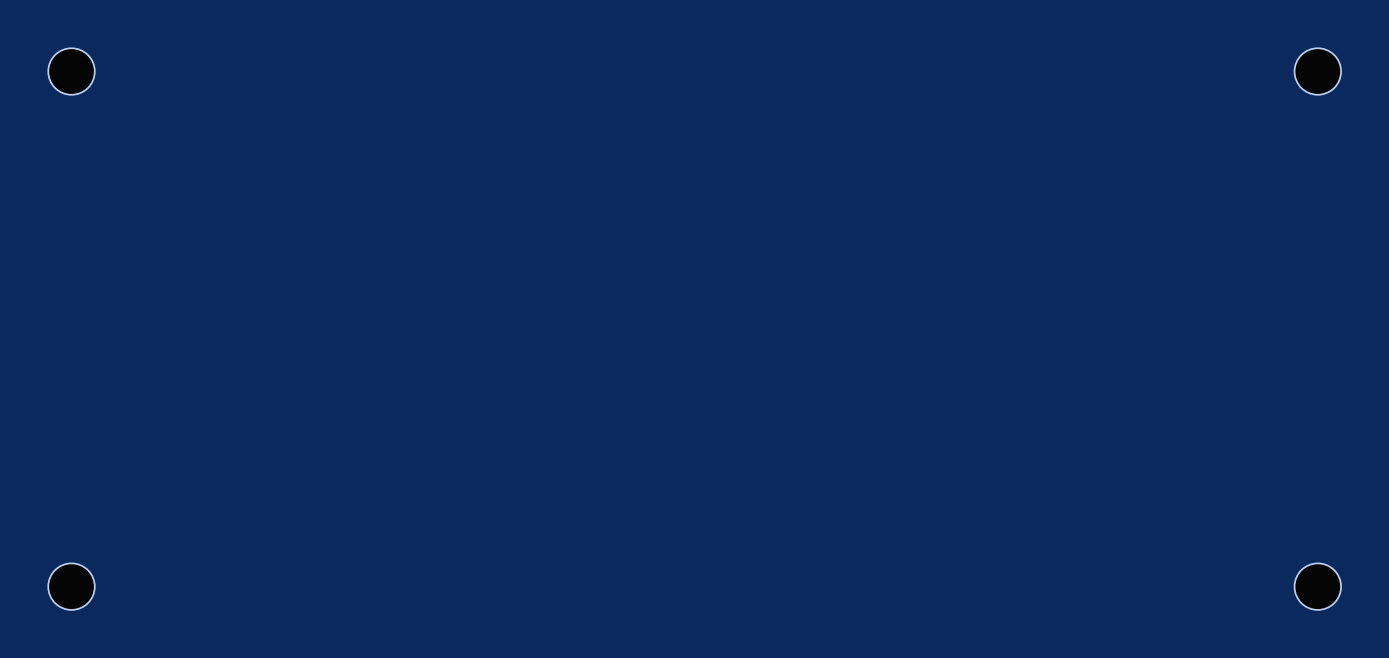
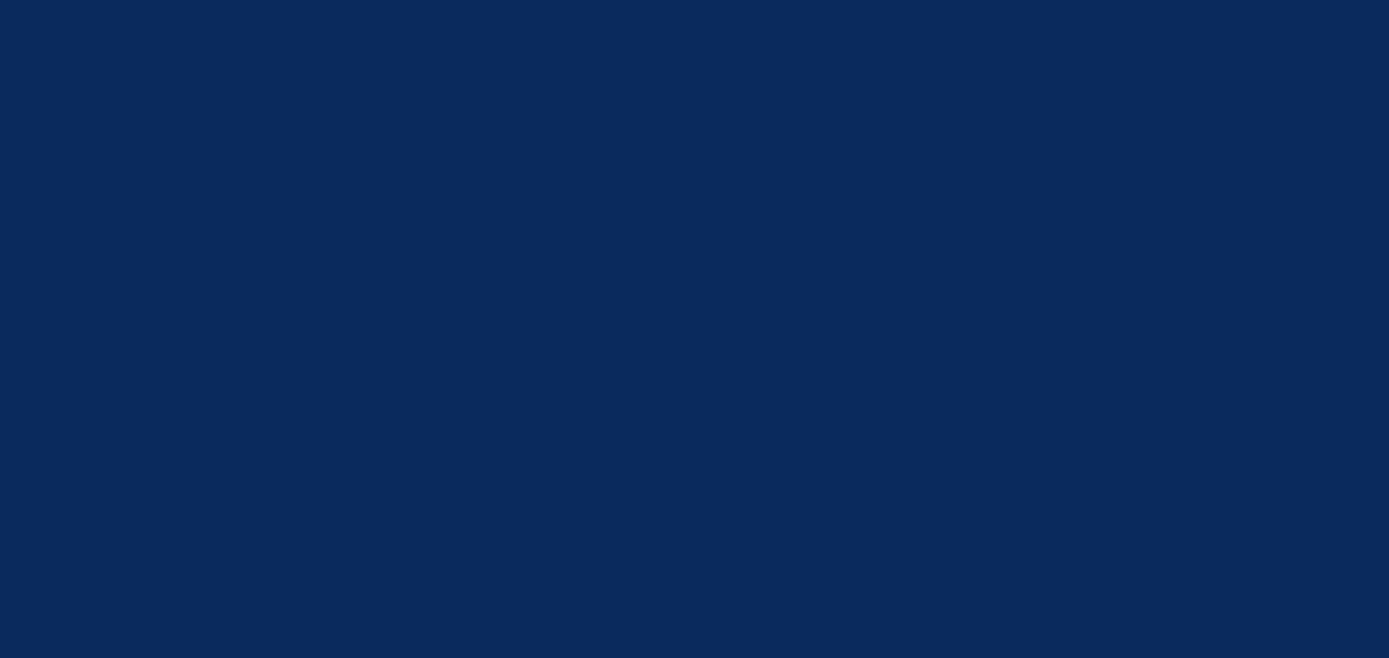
hole: (71, 71) -> none
hole: (1317, 71) -> none
hole: (71, 586) -> none
hole: (1317, 586) -> none

